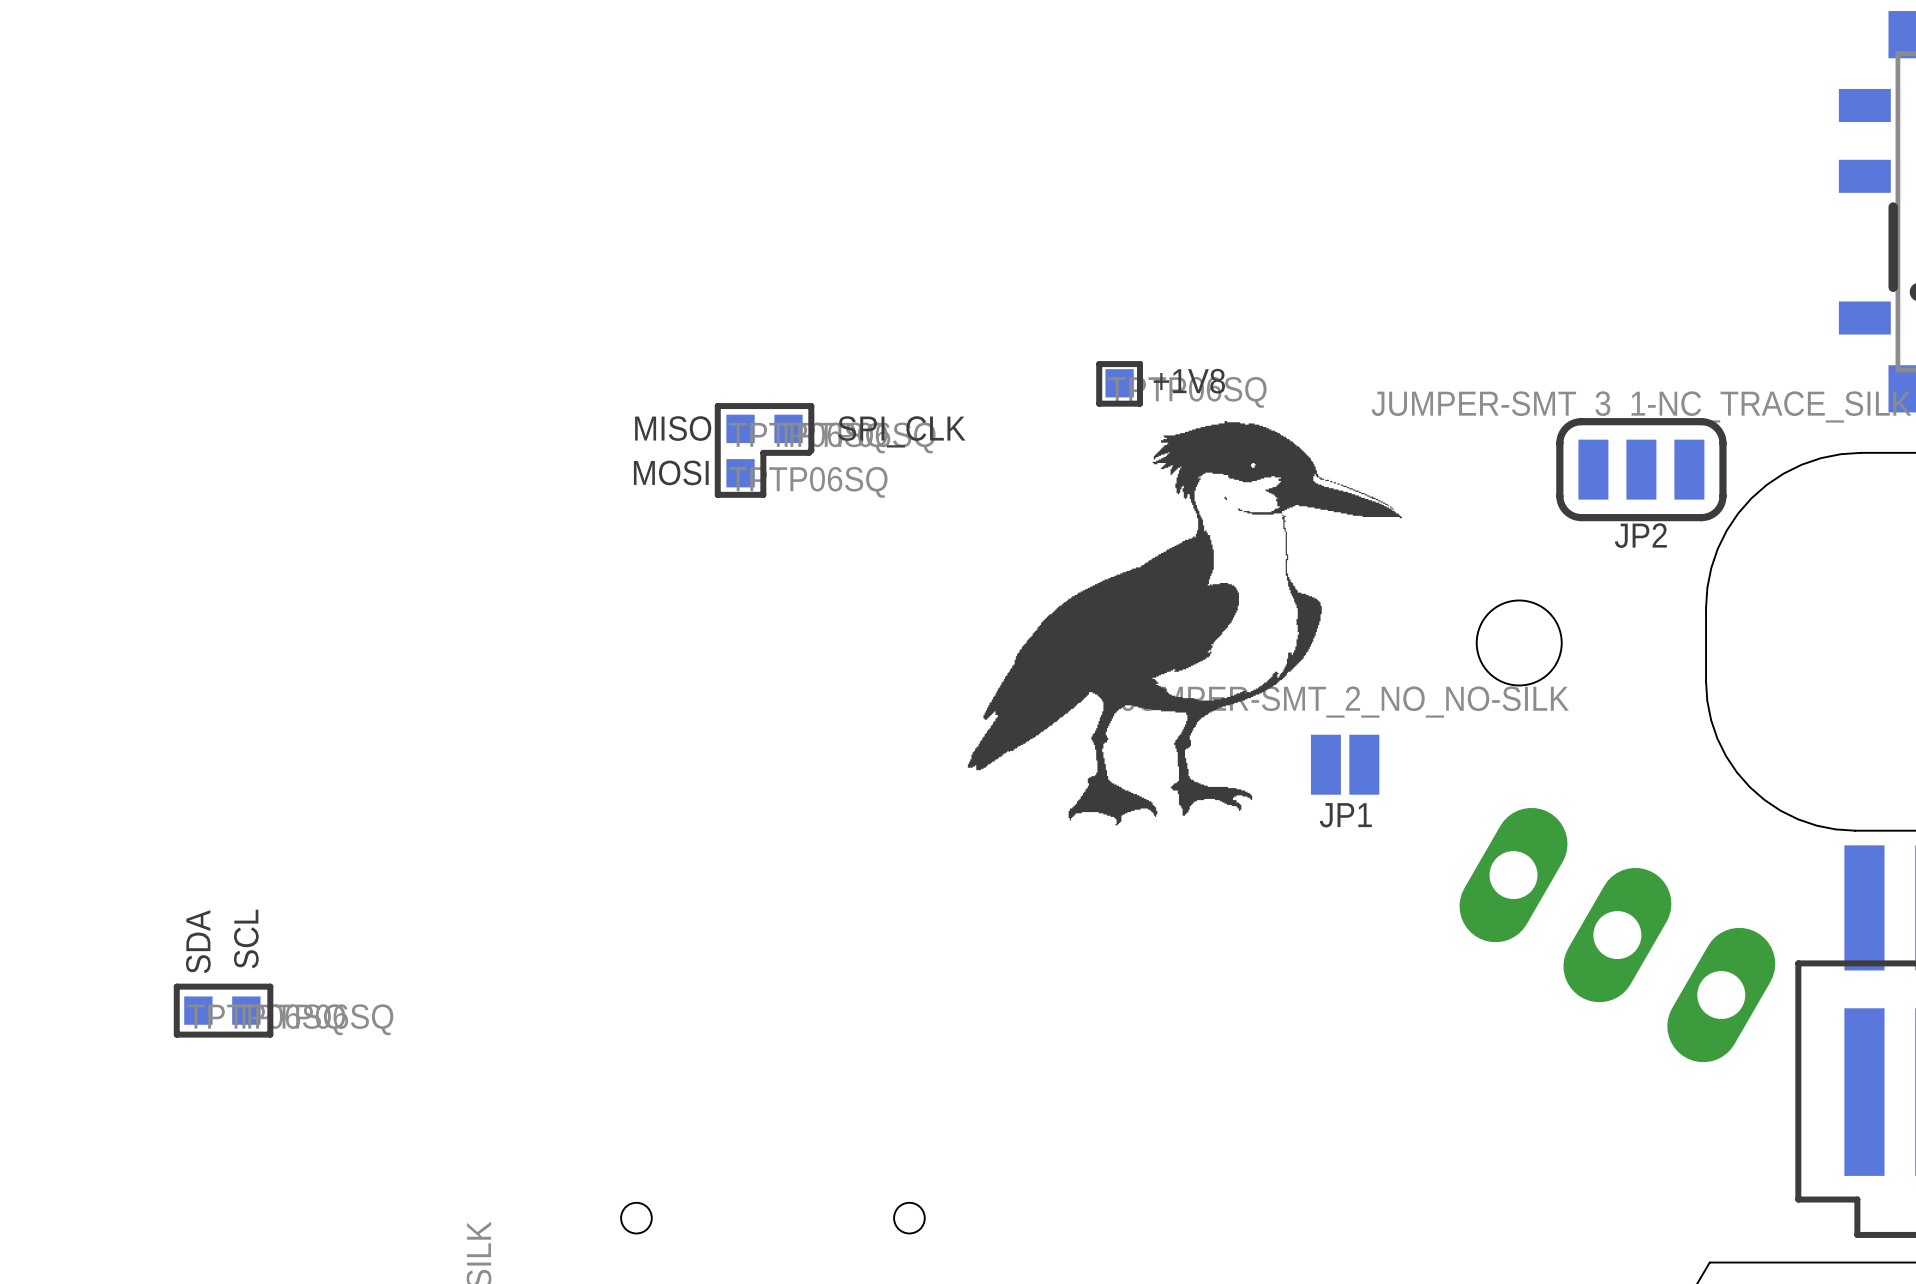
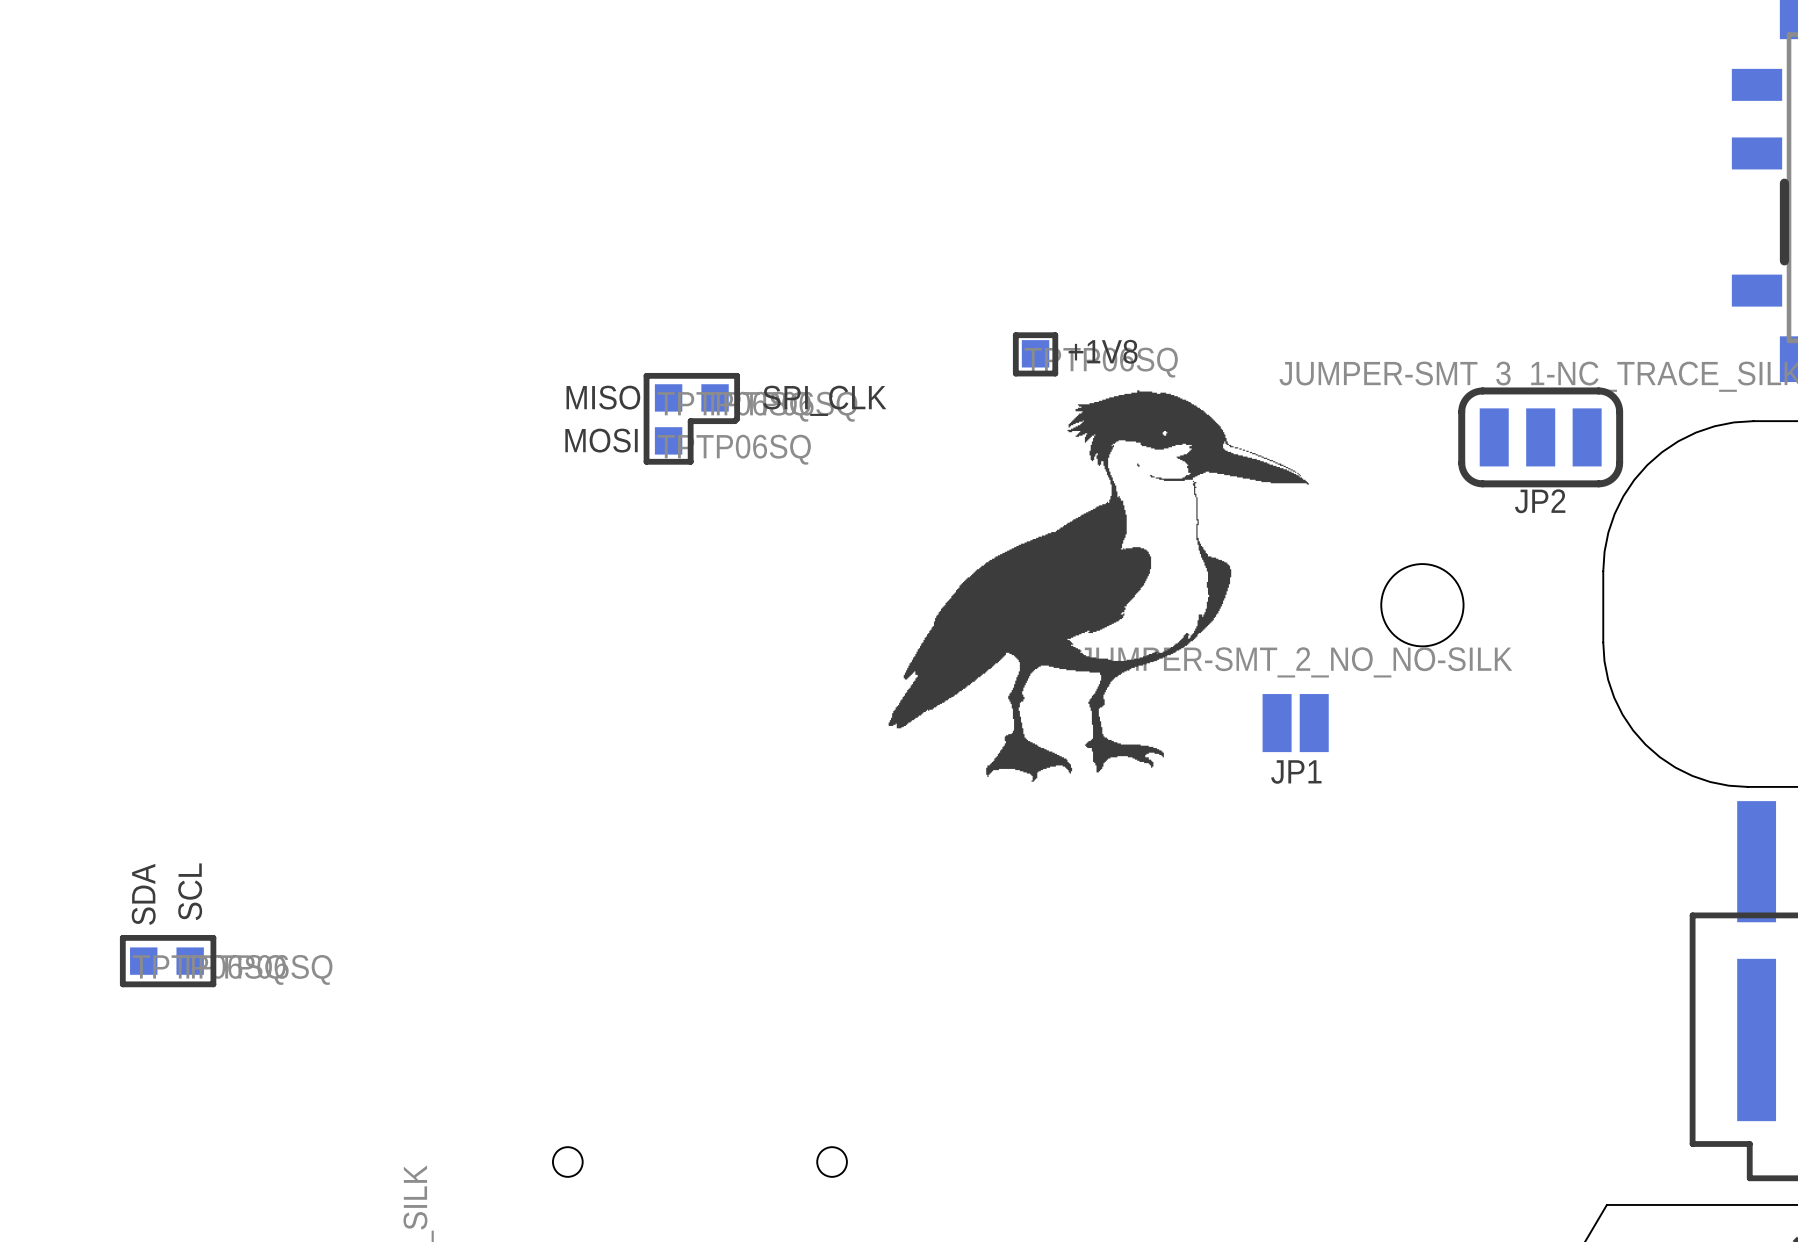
JP1 position: (1345, 764) -> (1295, 723)
part: (1617, 935) -> none

